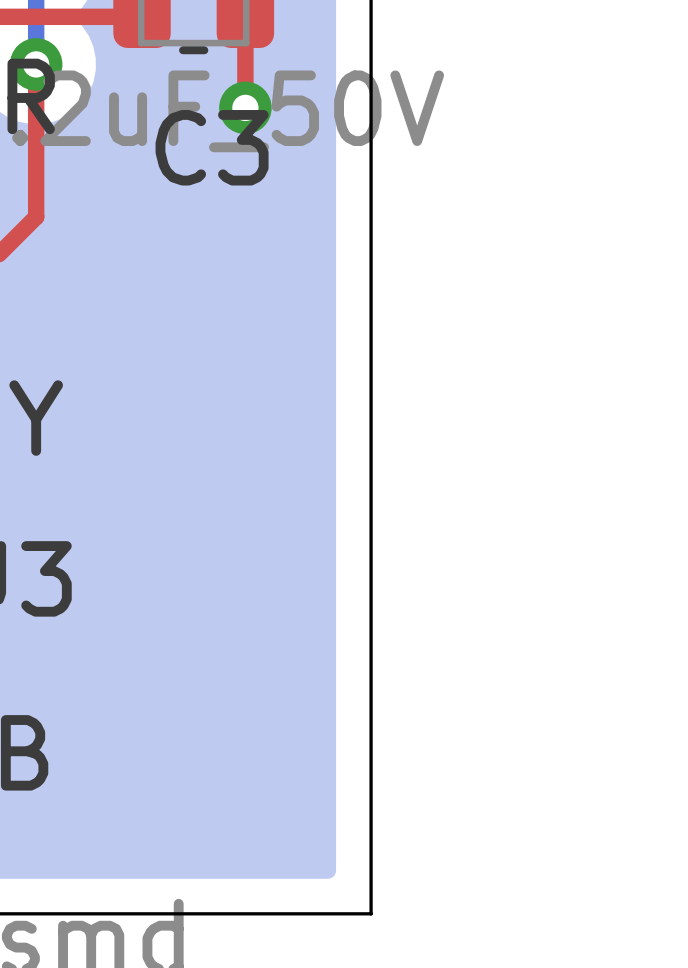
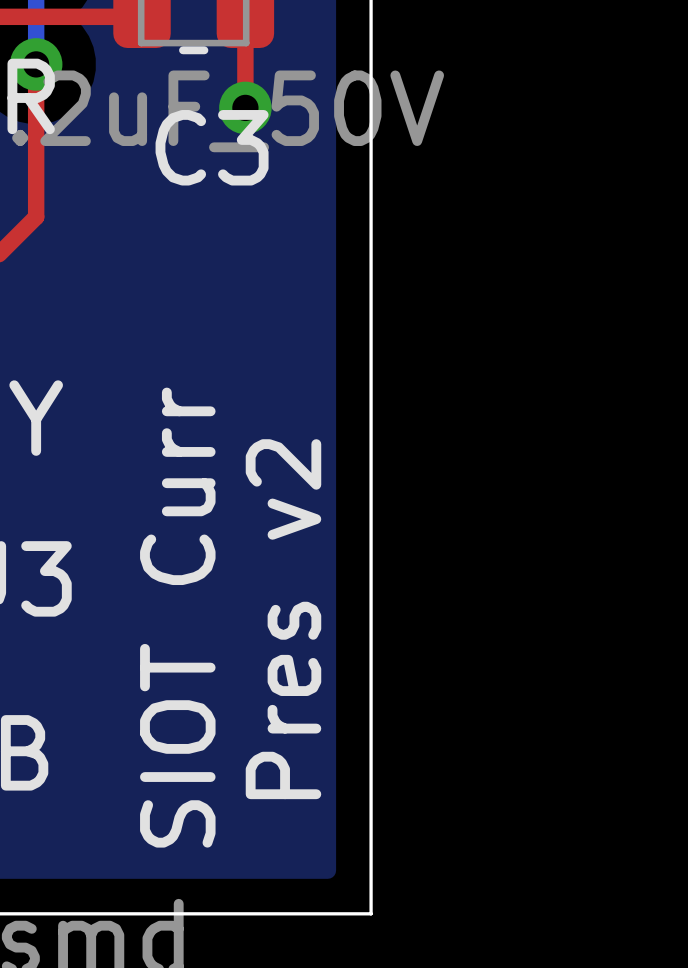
text: none -> SIOT Curr (177, 617)
text: none -> Pres v2 (283, 619)

